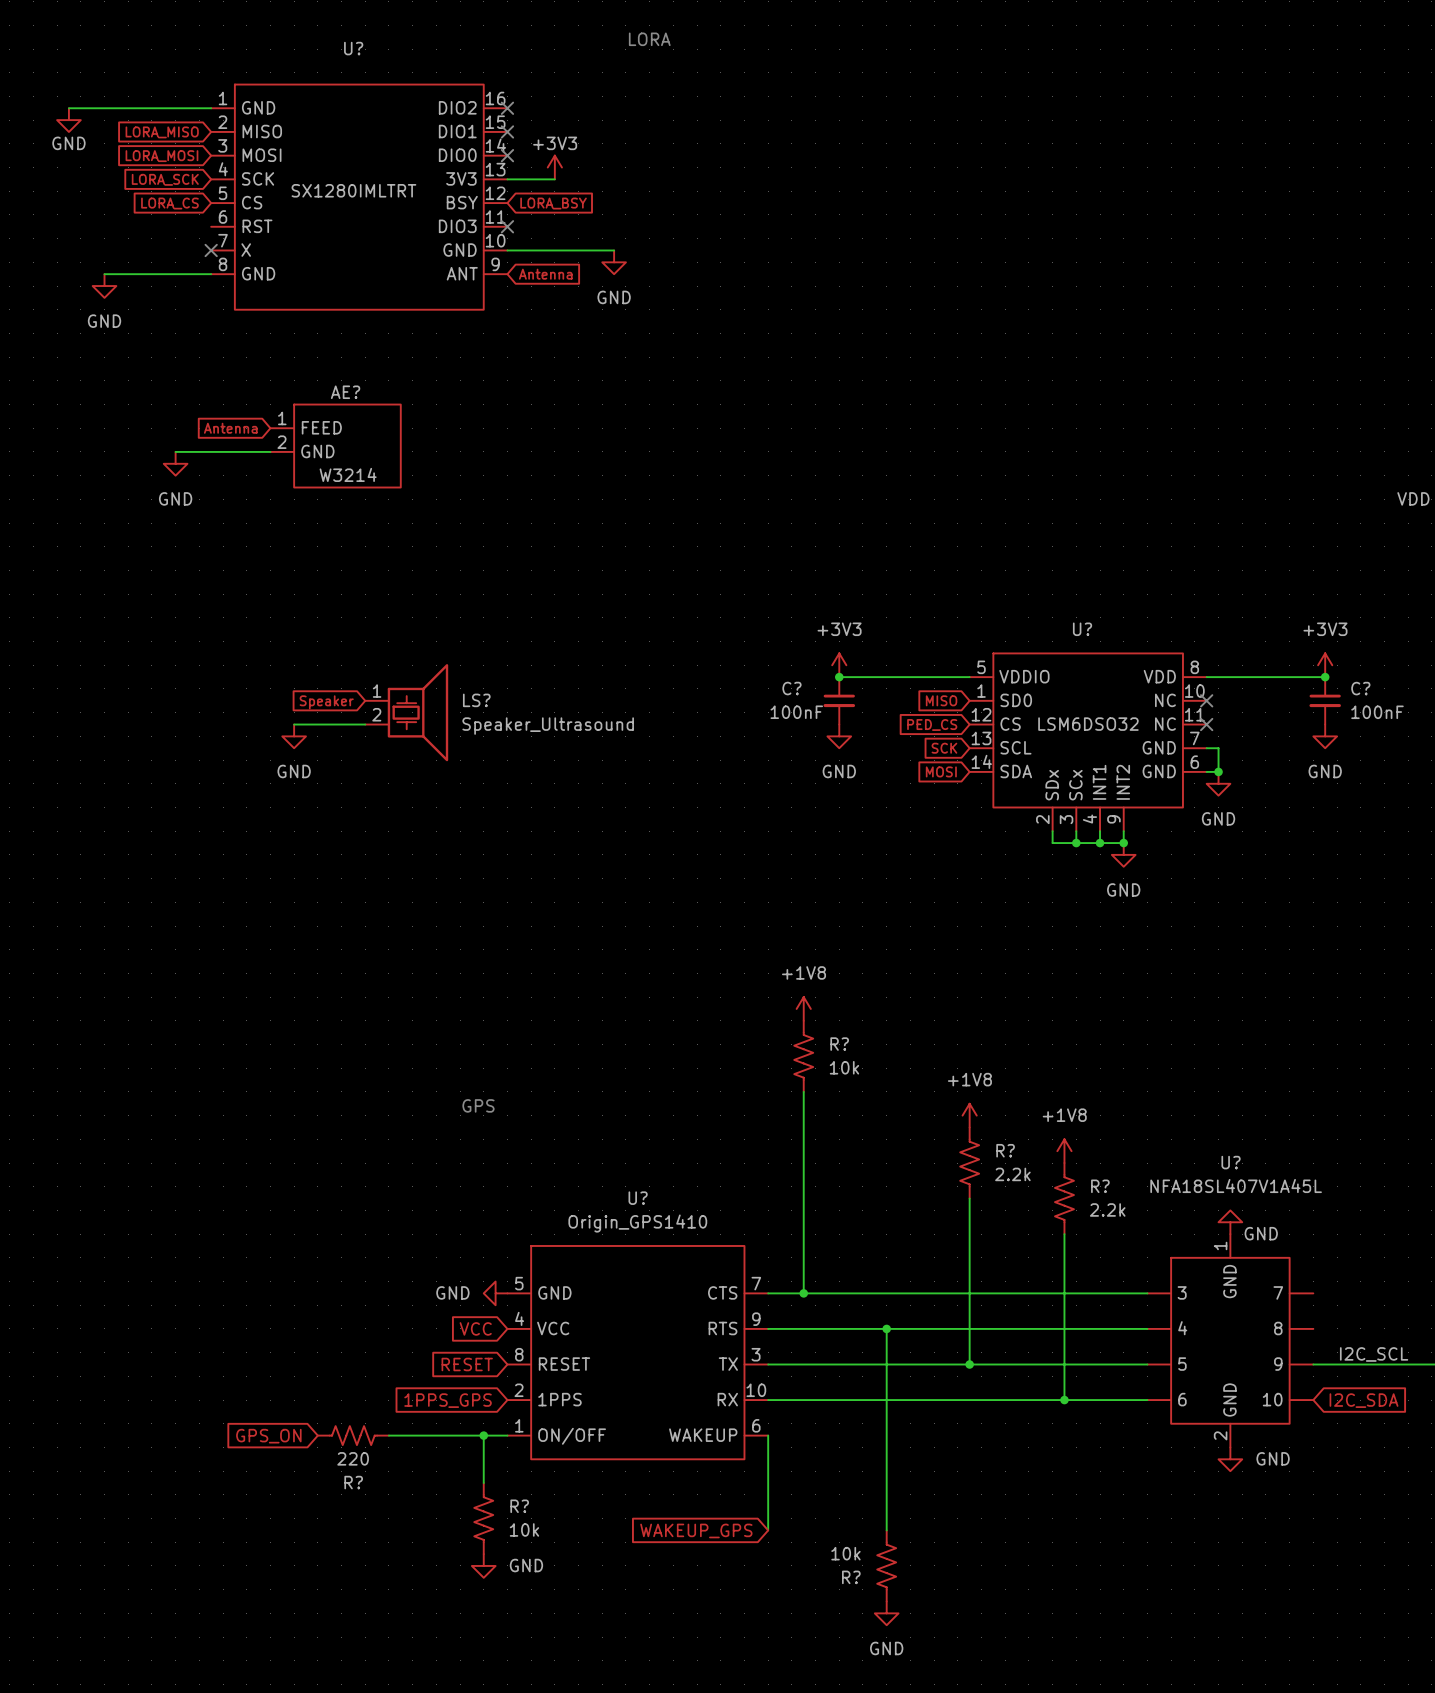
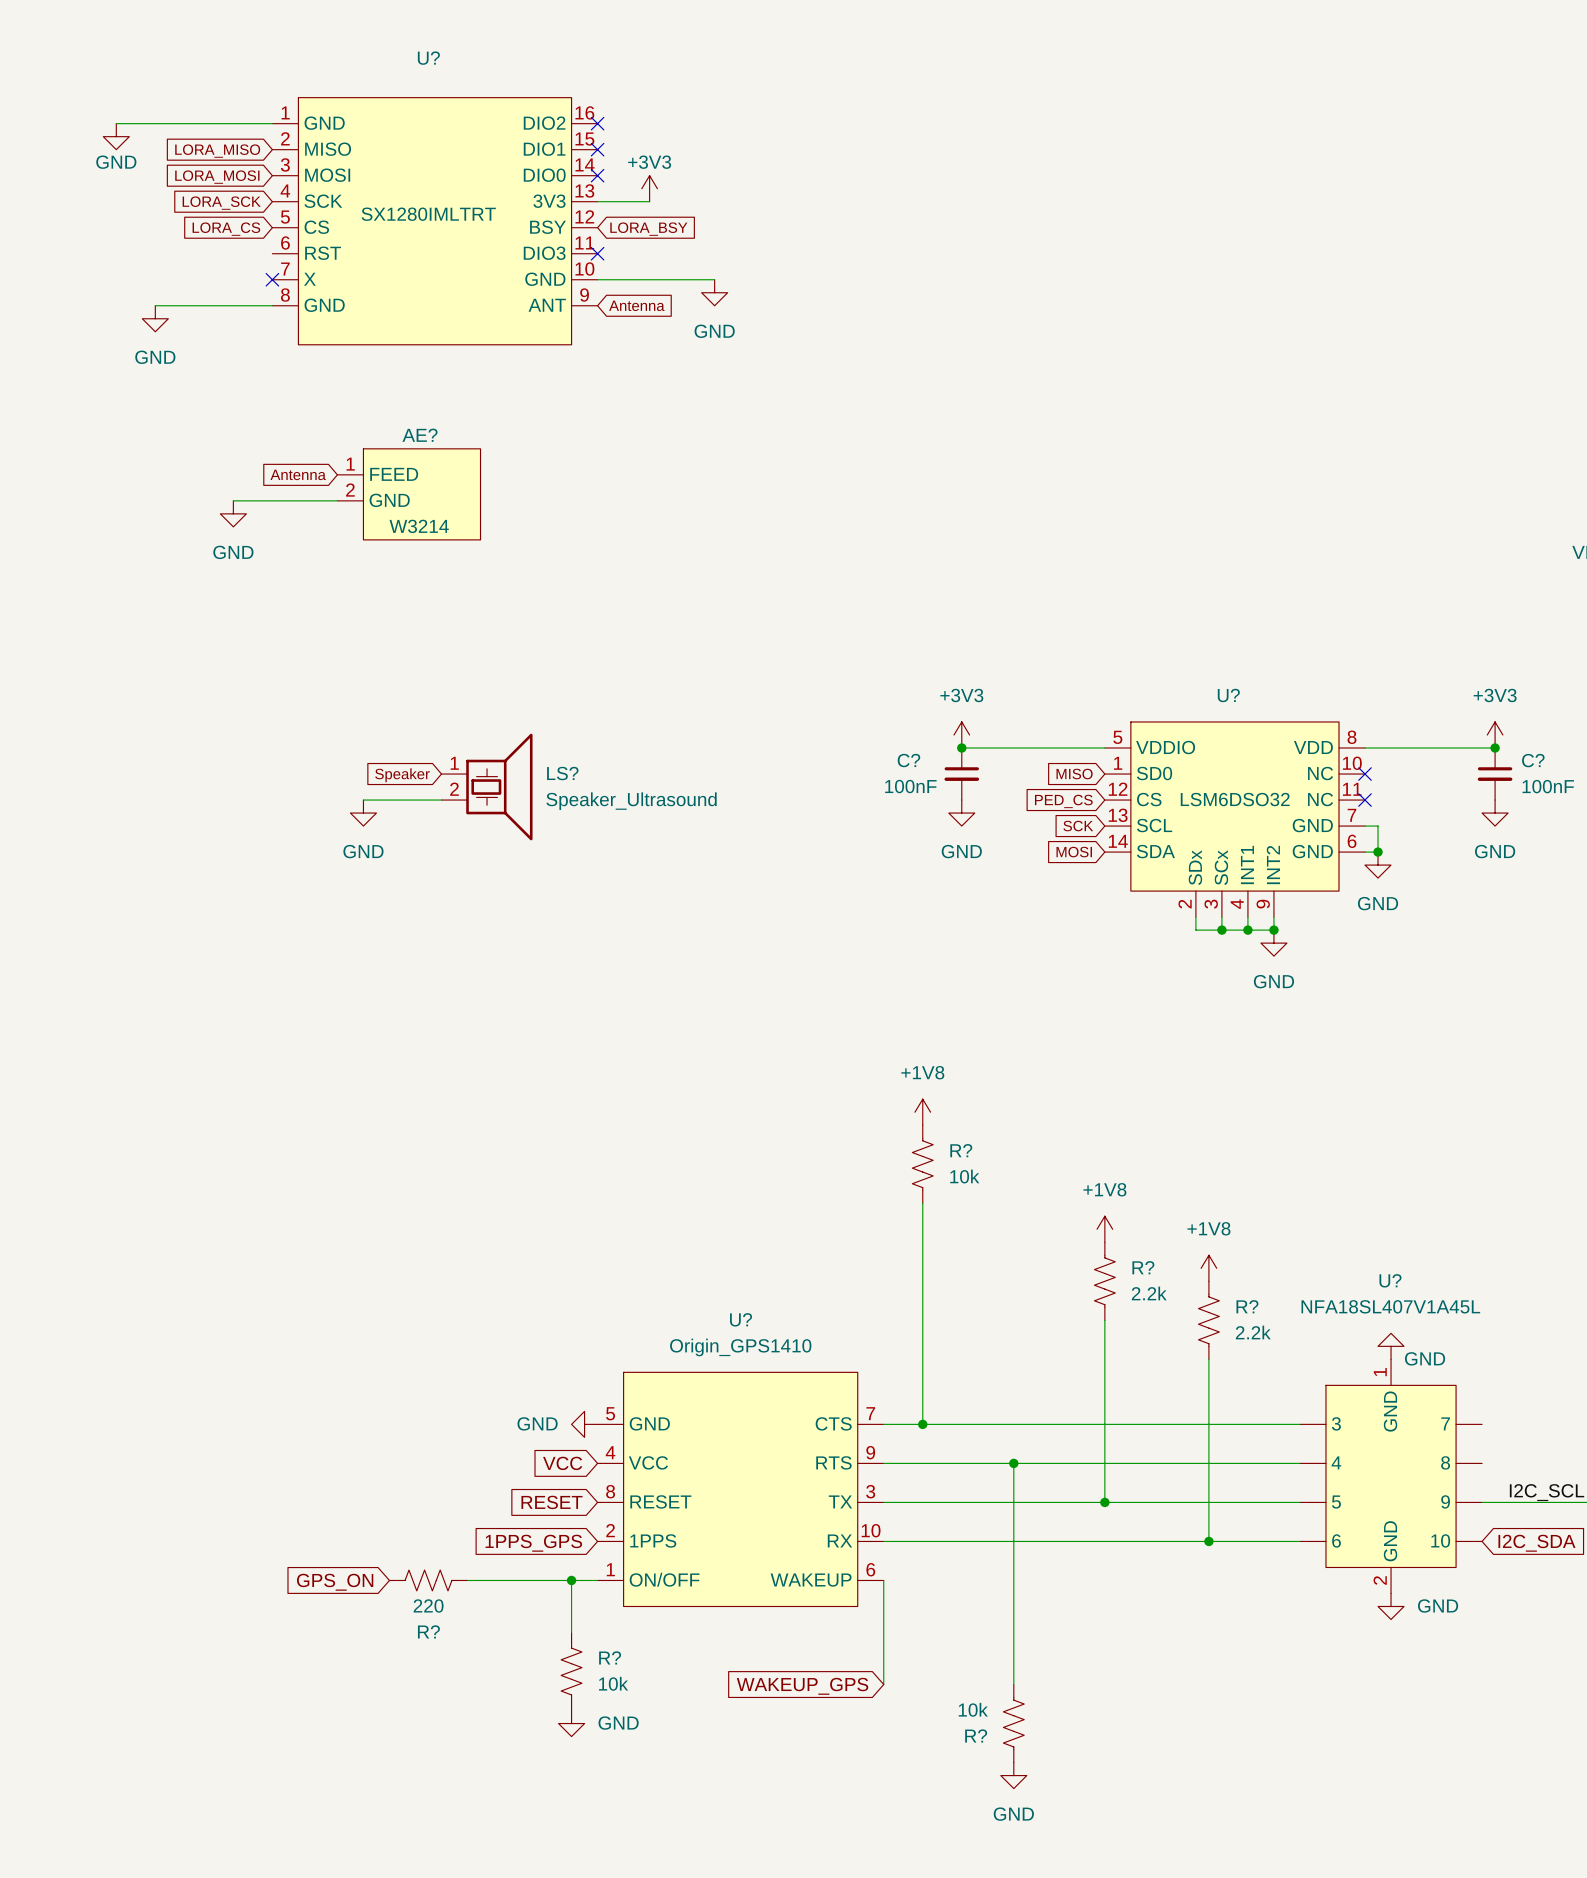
text: LORA (649, 39) -> none
text: GPS (478, 1105) -> none

